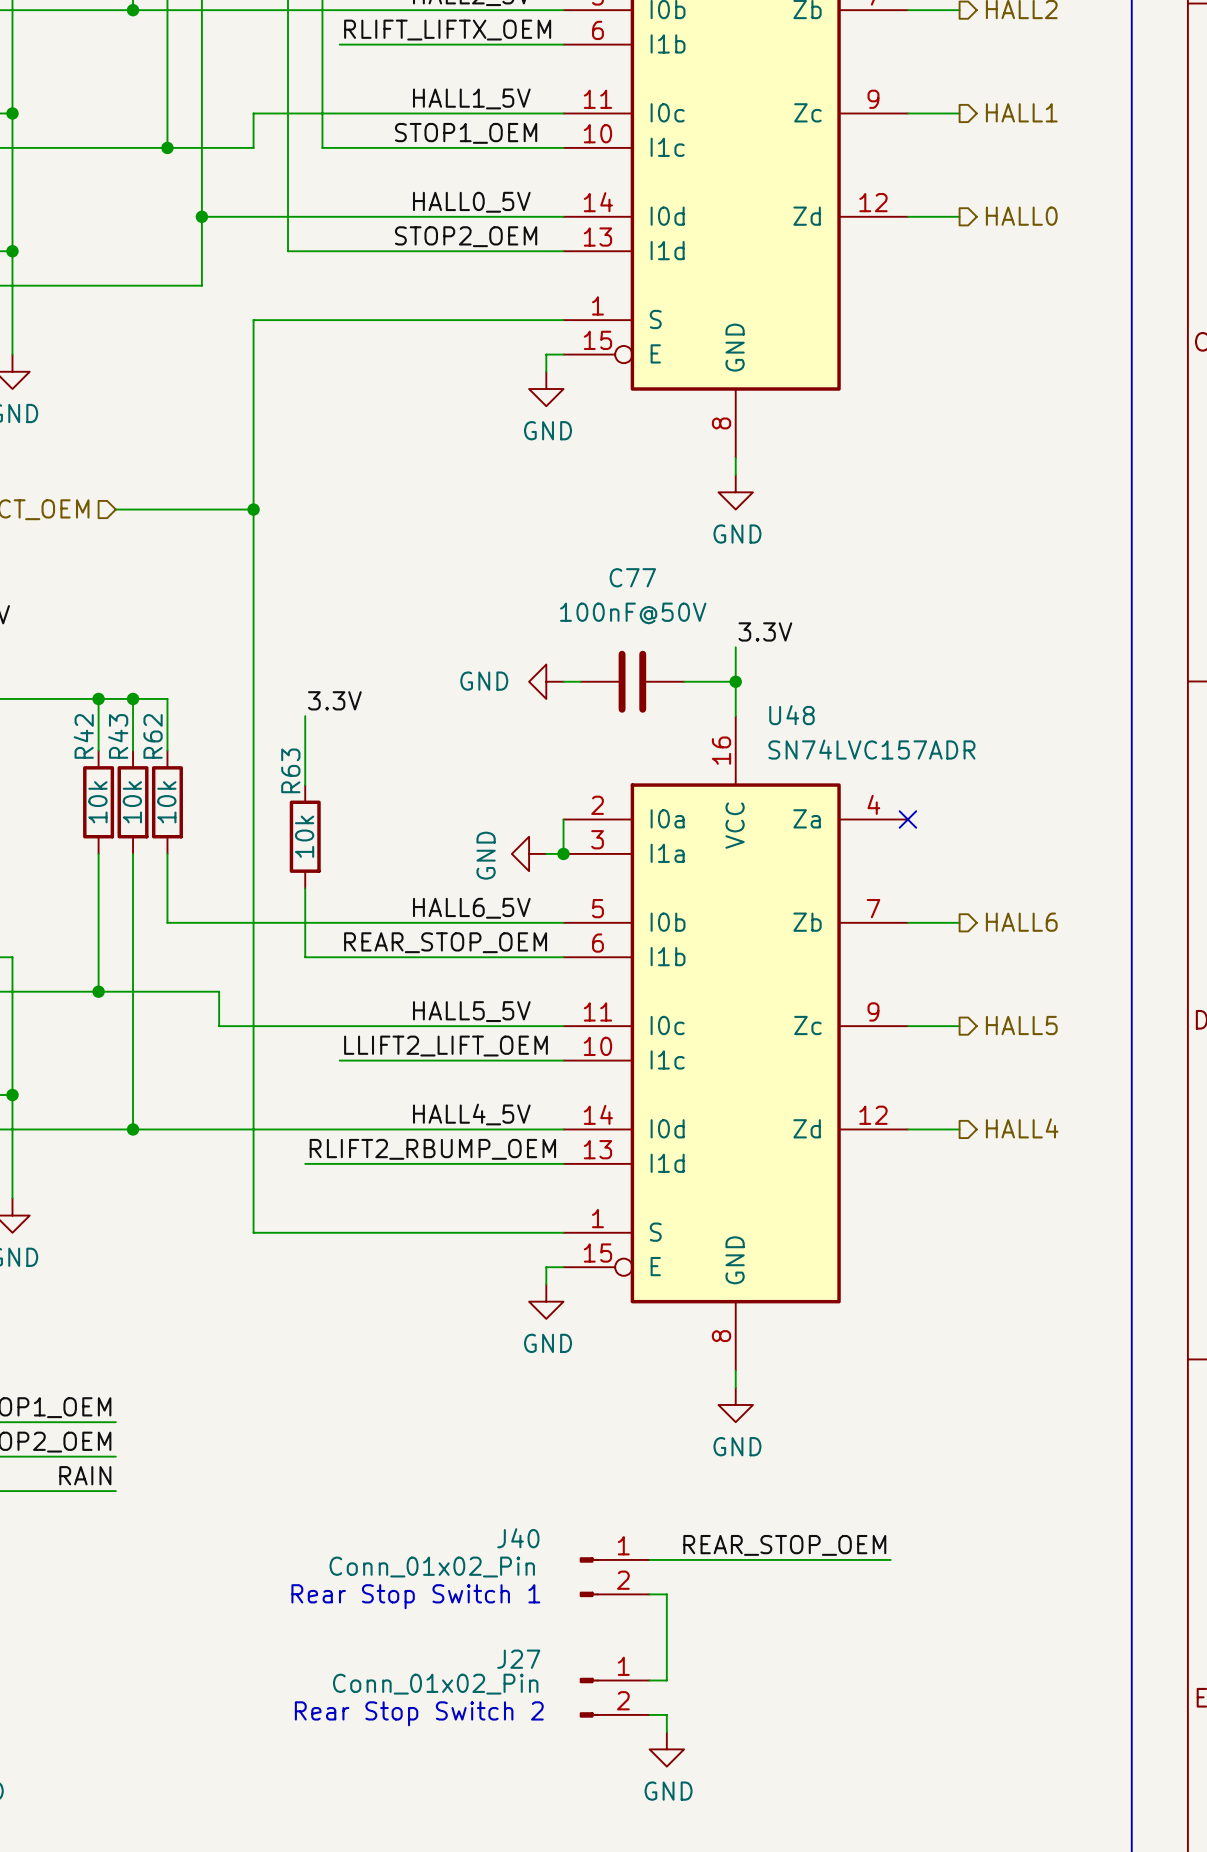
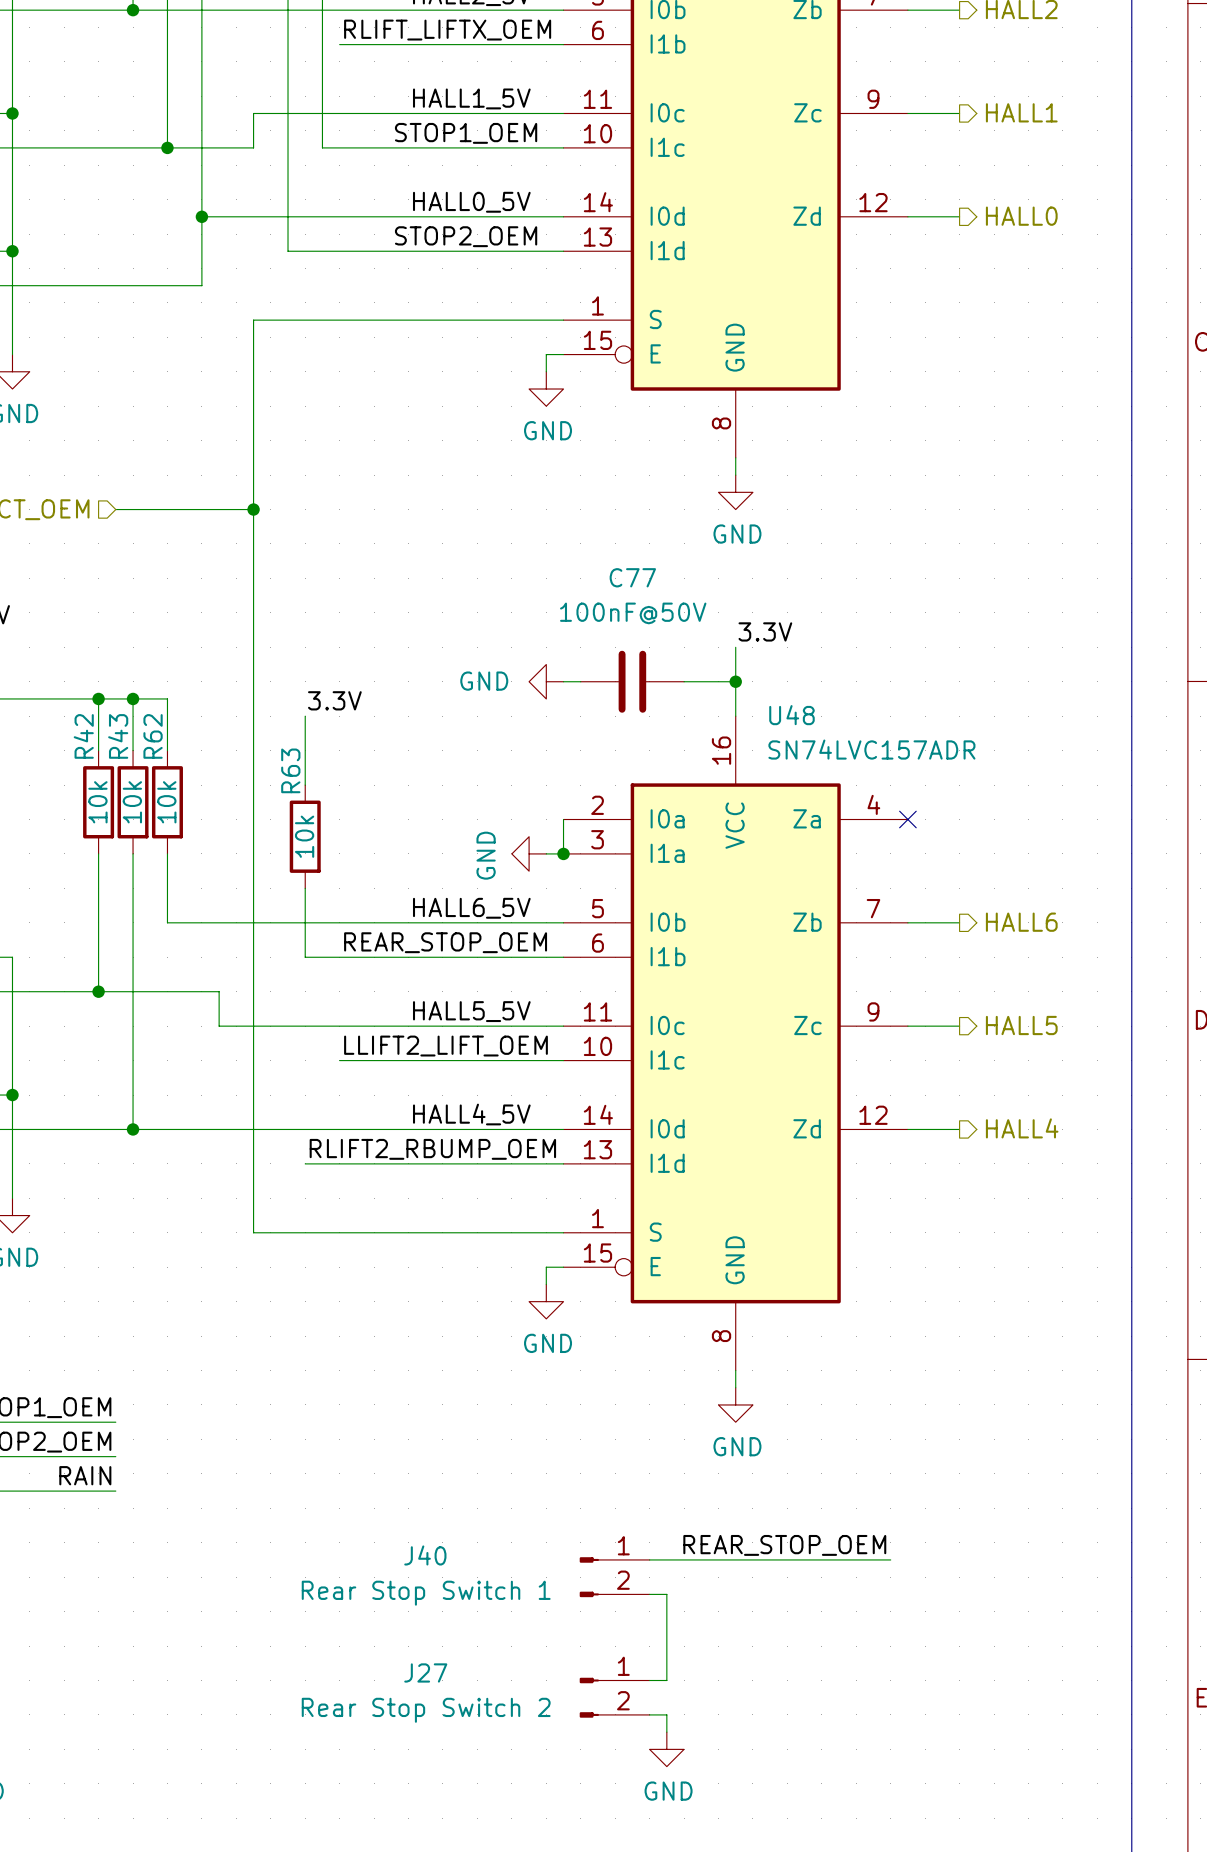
J40 name position: J40 (518, 1538) -> J40 (425, 1555)
J40 value: Conn_01x02_Pin (432, 1567) -> Rear Stop Switch 1 (426, 1593)
text: Rear Stop Switch 1 (415, 1596) -> none
J27 name position: J27 (518, 1659) -> J27 (425, 1672)
J27 value: Conn_01x02_Pin (435, 1684) -> Rear Stop Switch 2 (426, 1710)
text: Rear Stop Switch 2 (419, 1713) -> none

